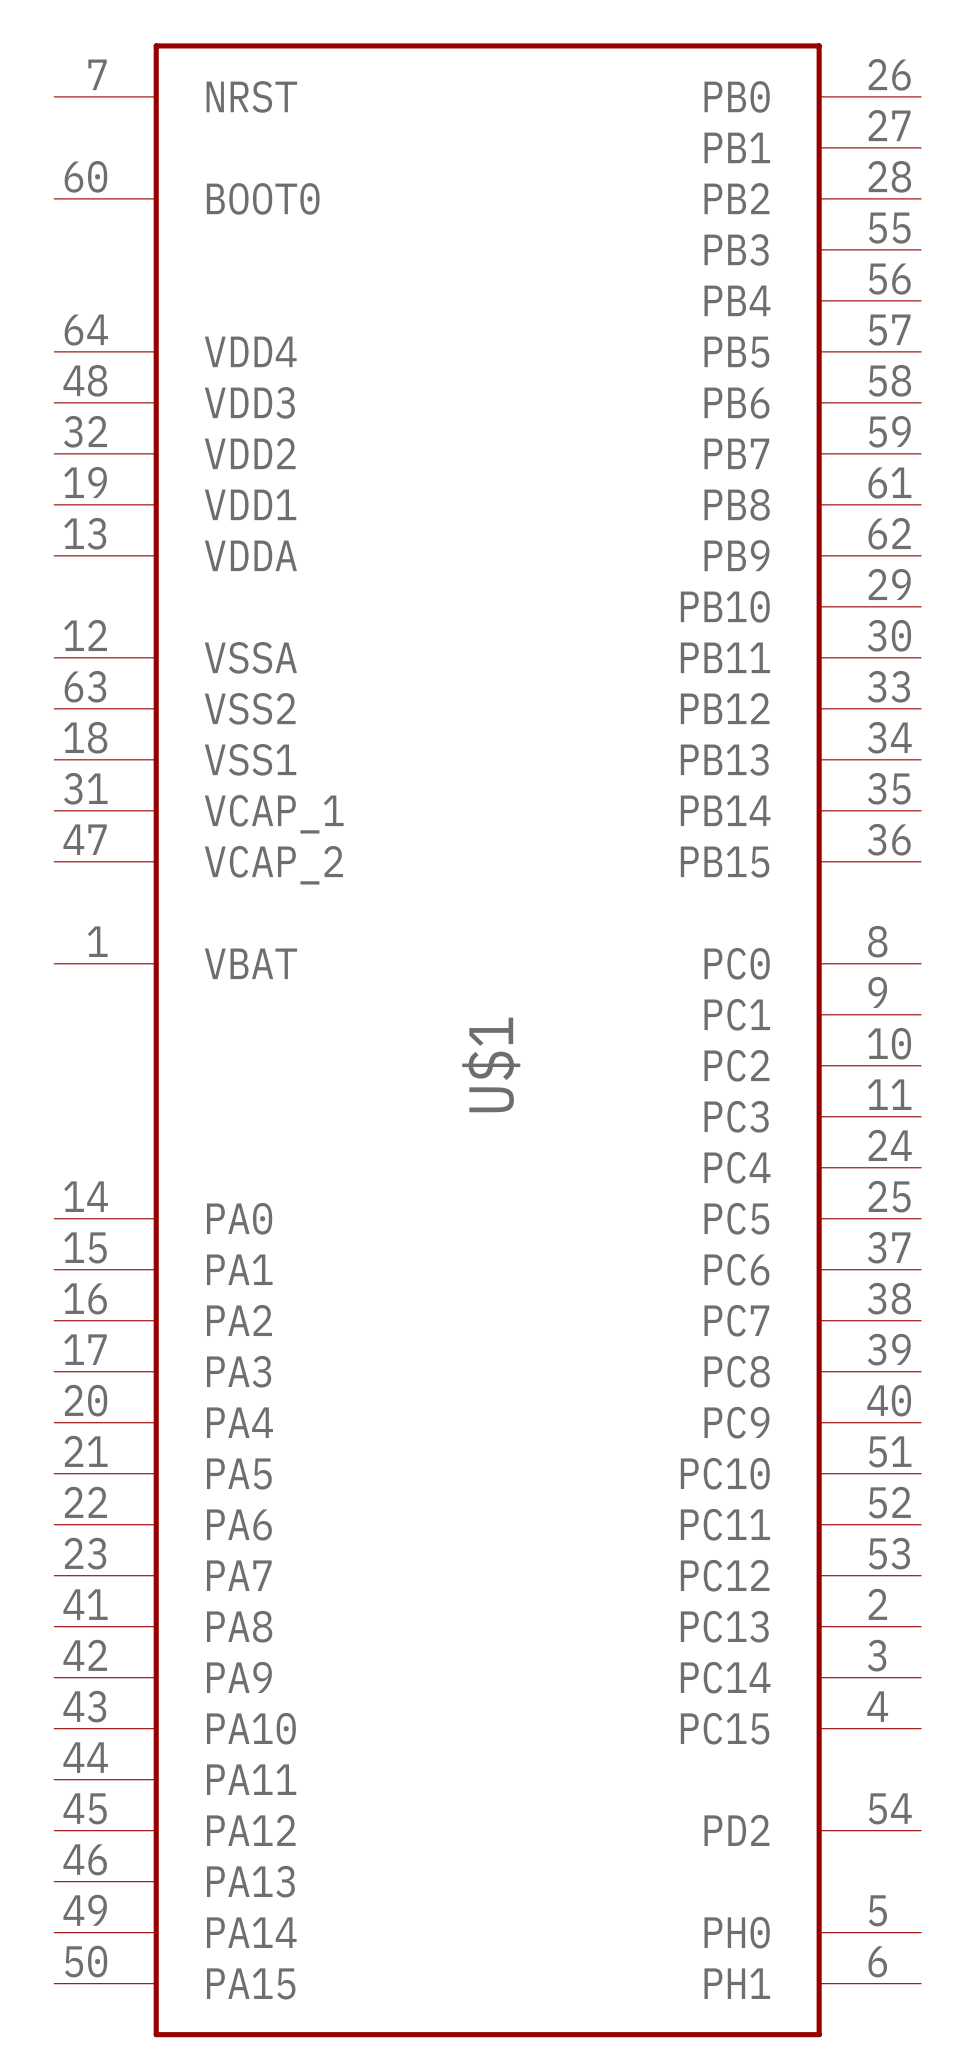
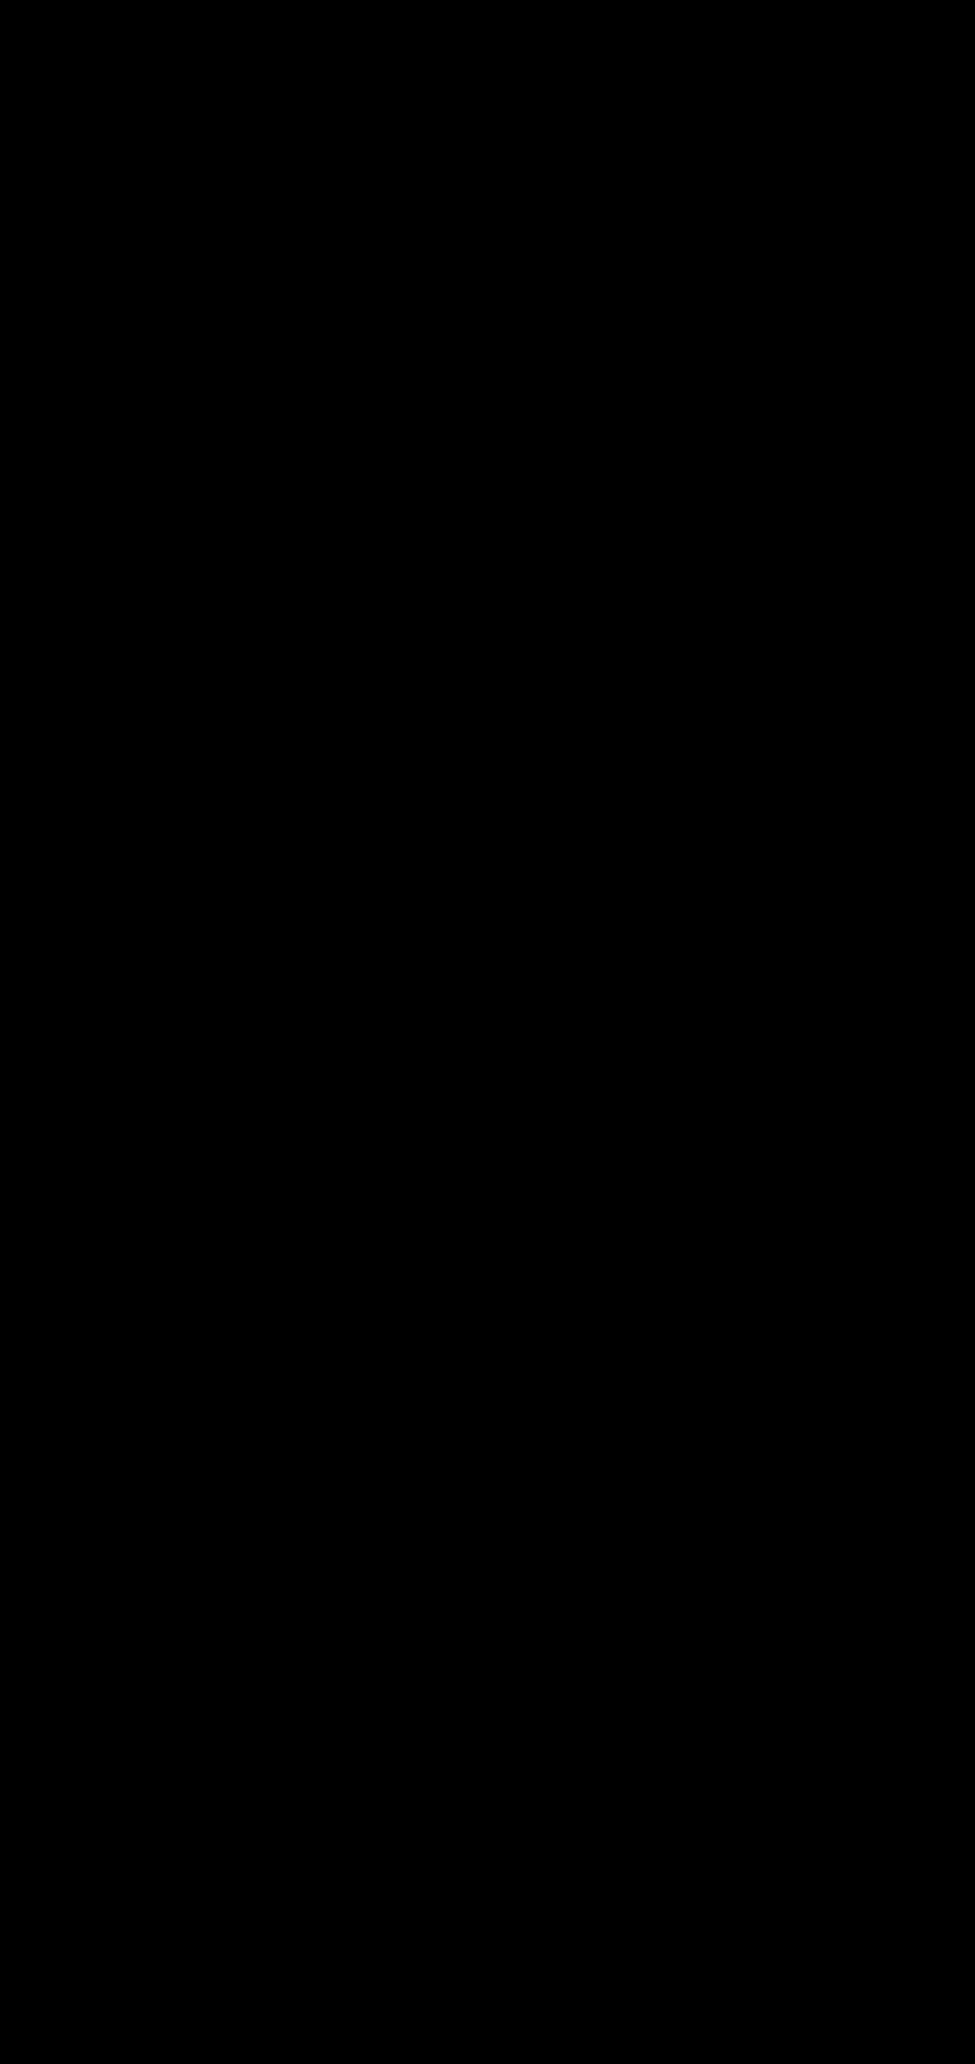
U$1: (487, 1040) -> none

